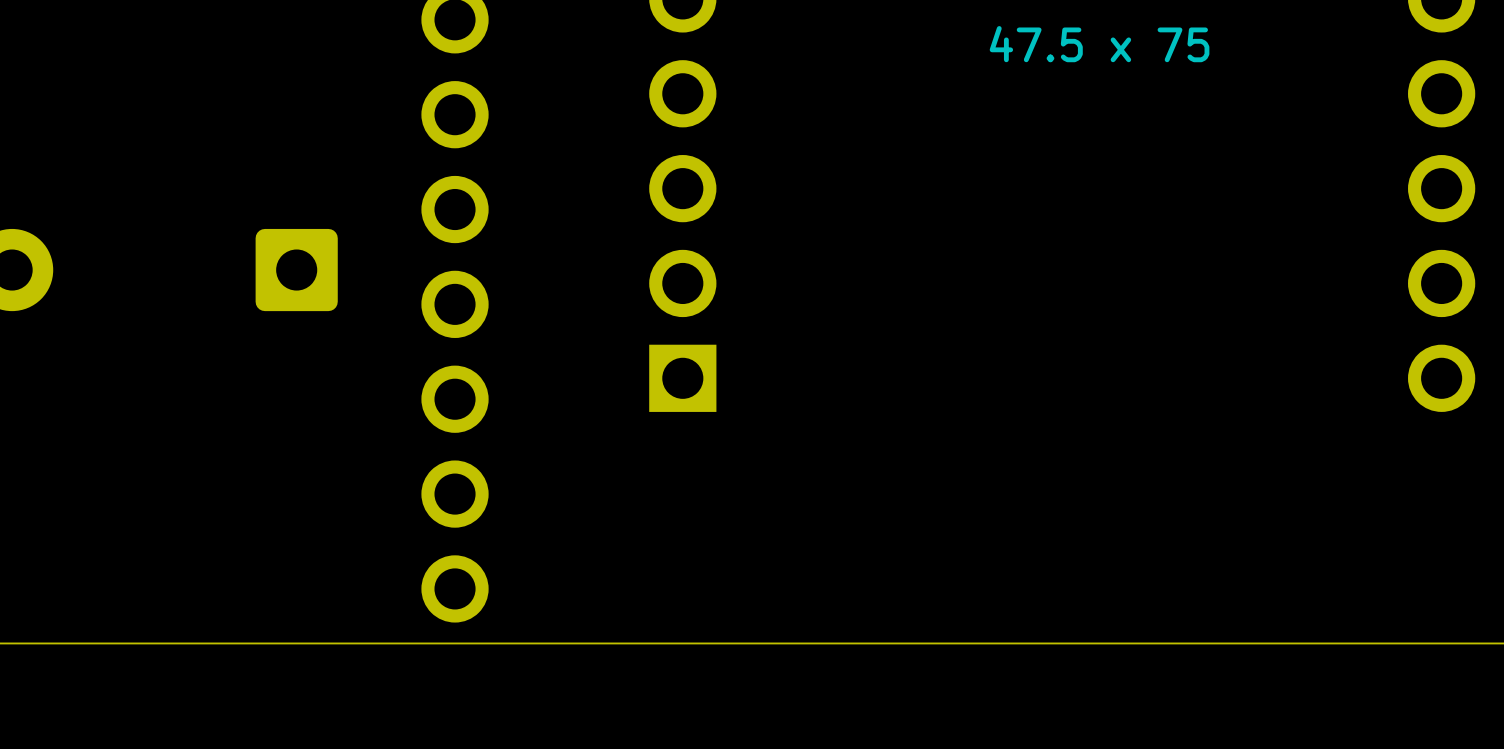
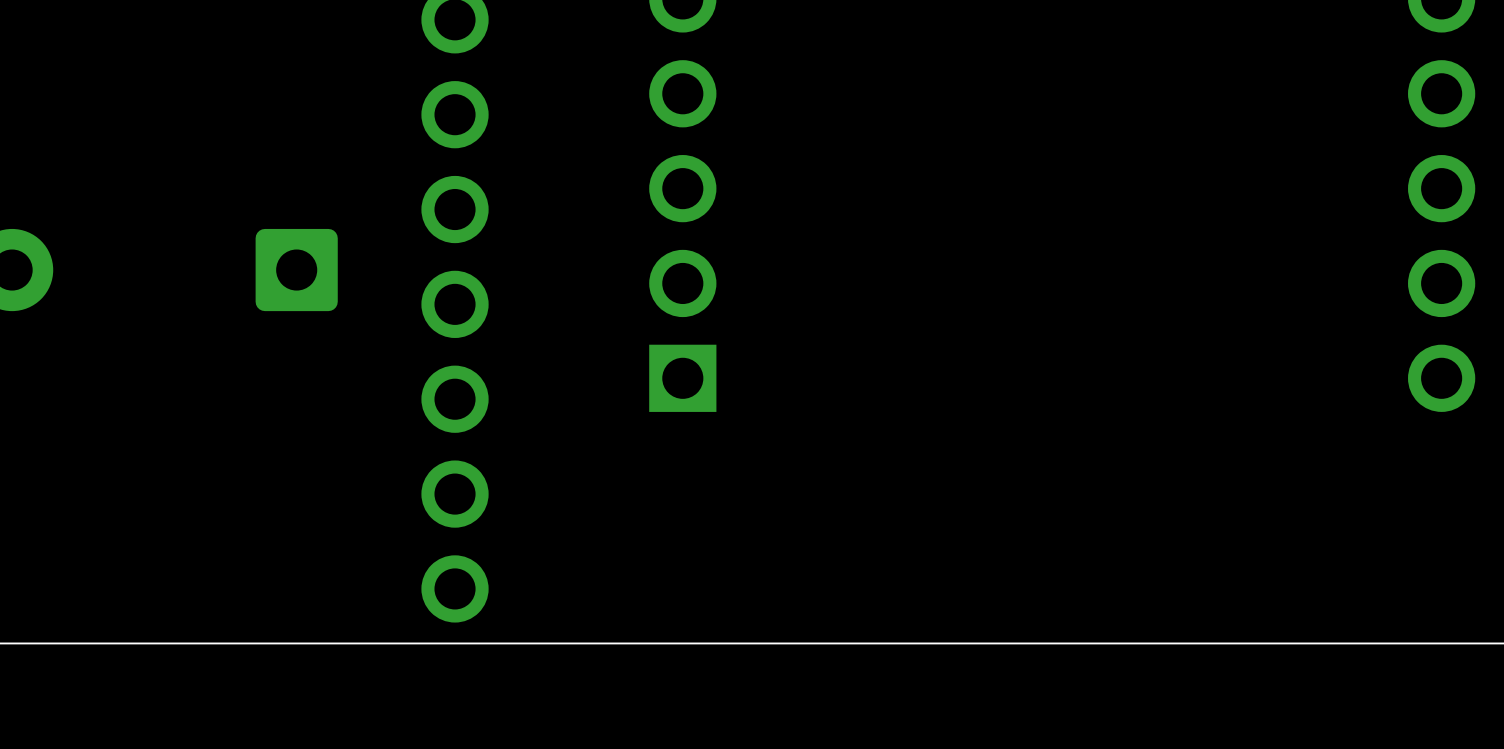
text: 47.5 x 75 (1099, 44) -> none

